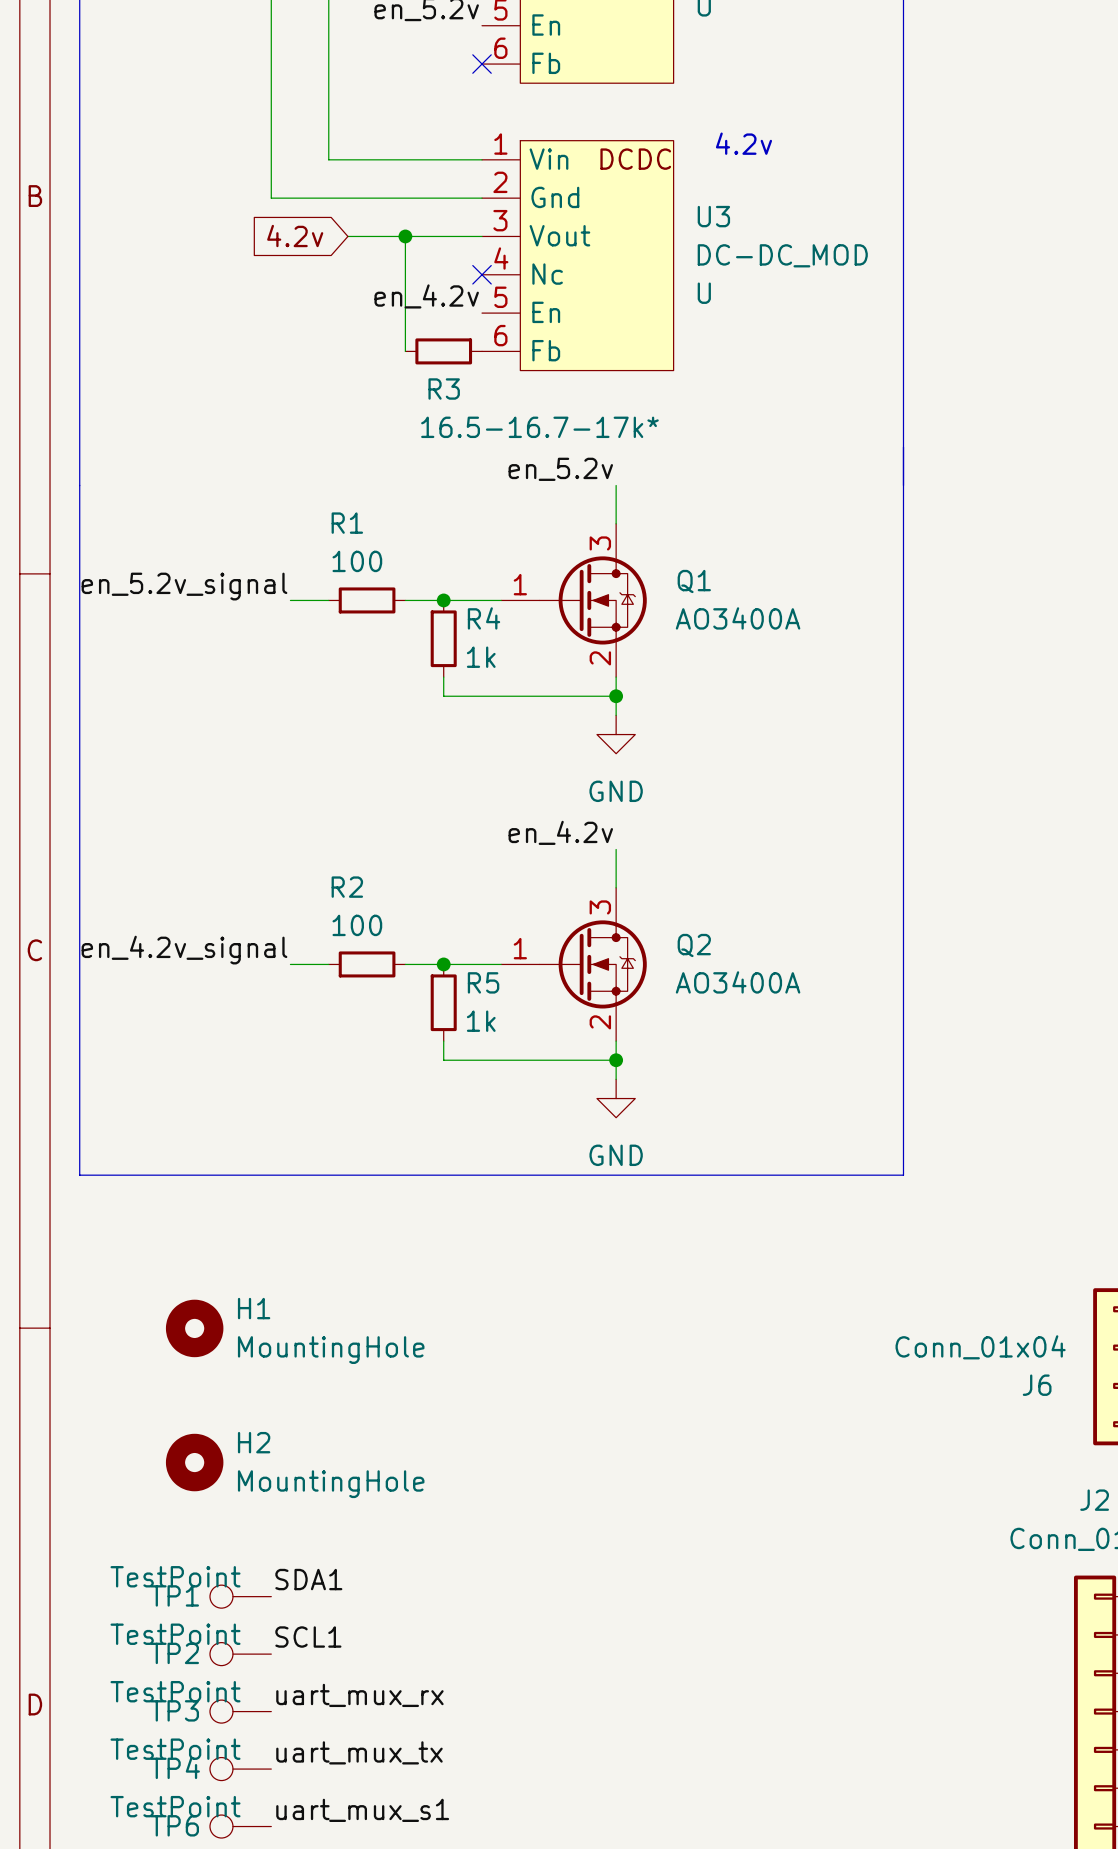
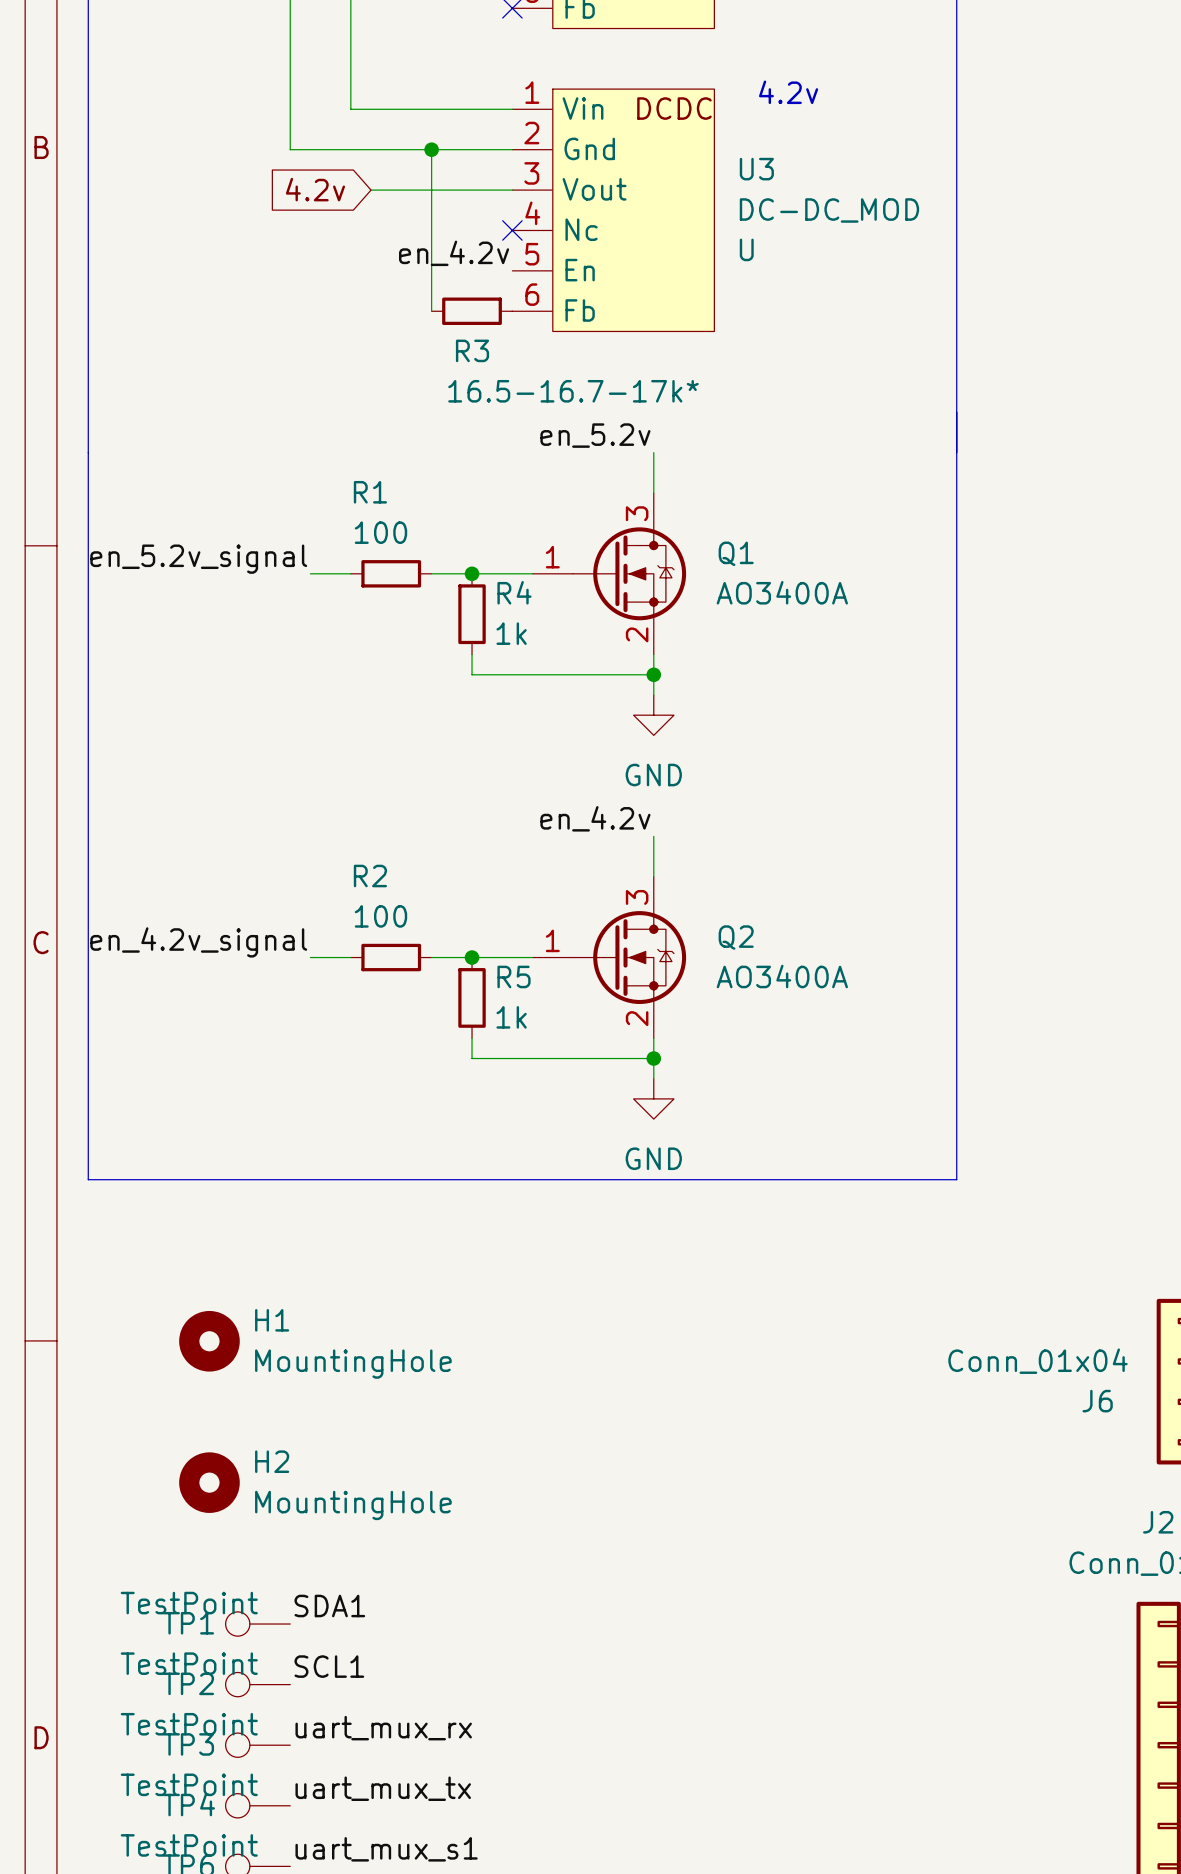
wire: none -> (431, 149) (431, 190)
junction position: (405, 236) -> (431, 149)

